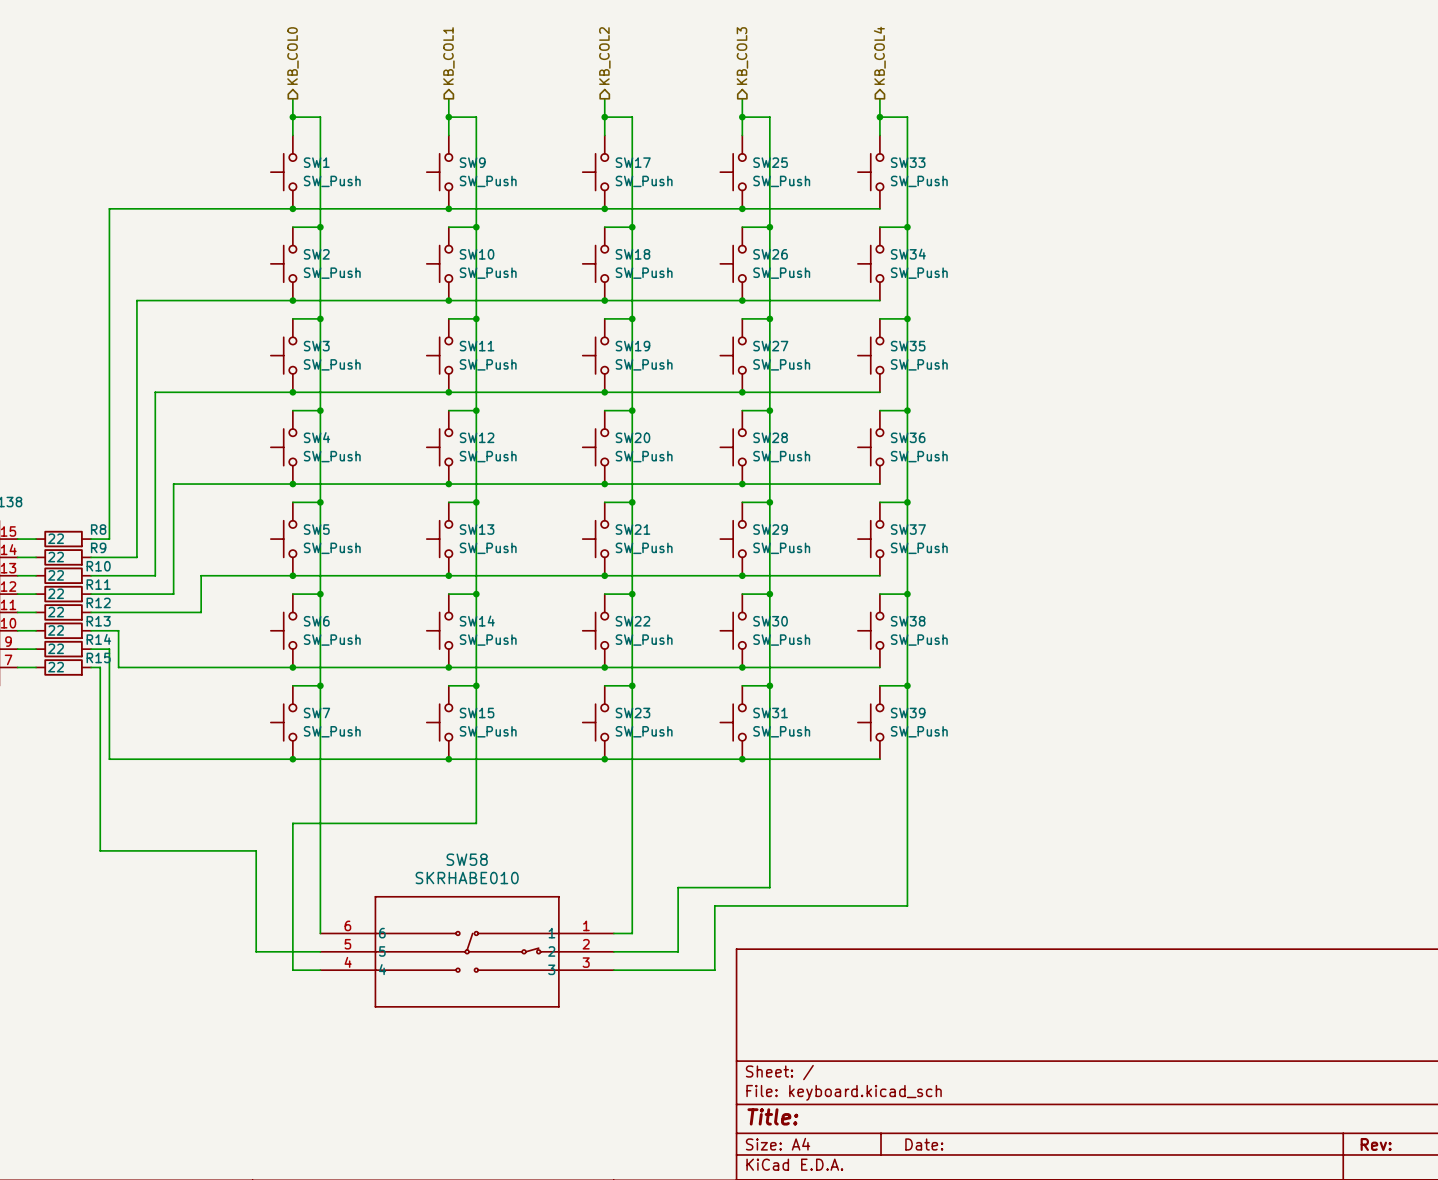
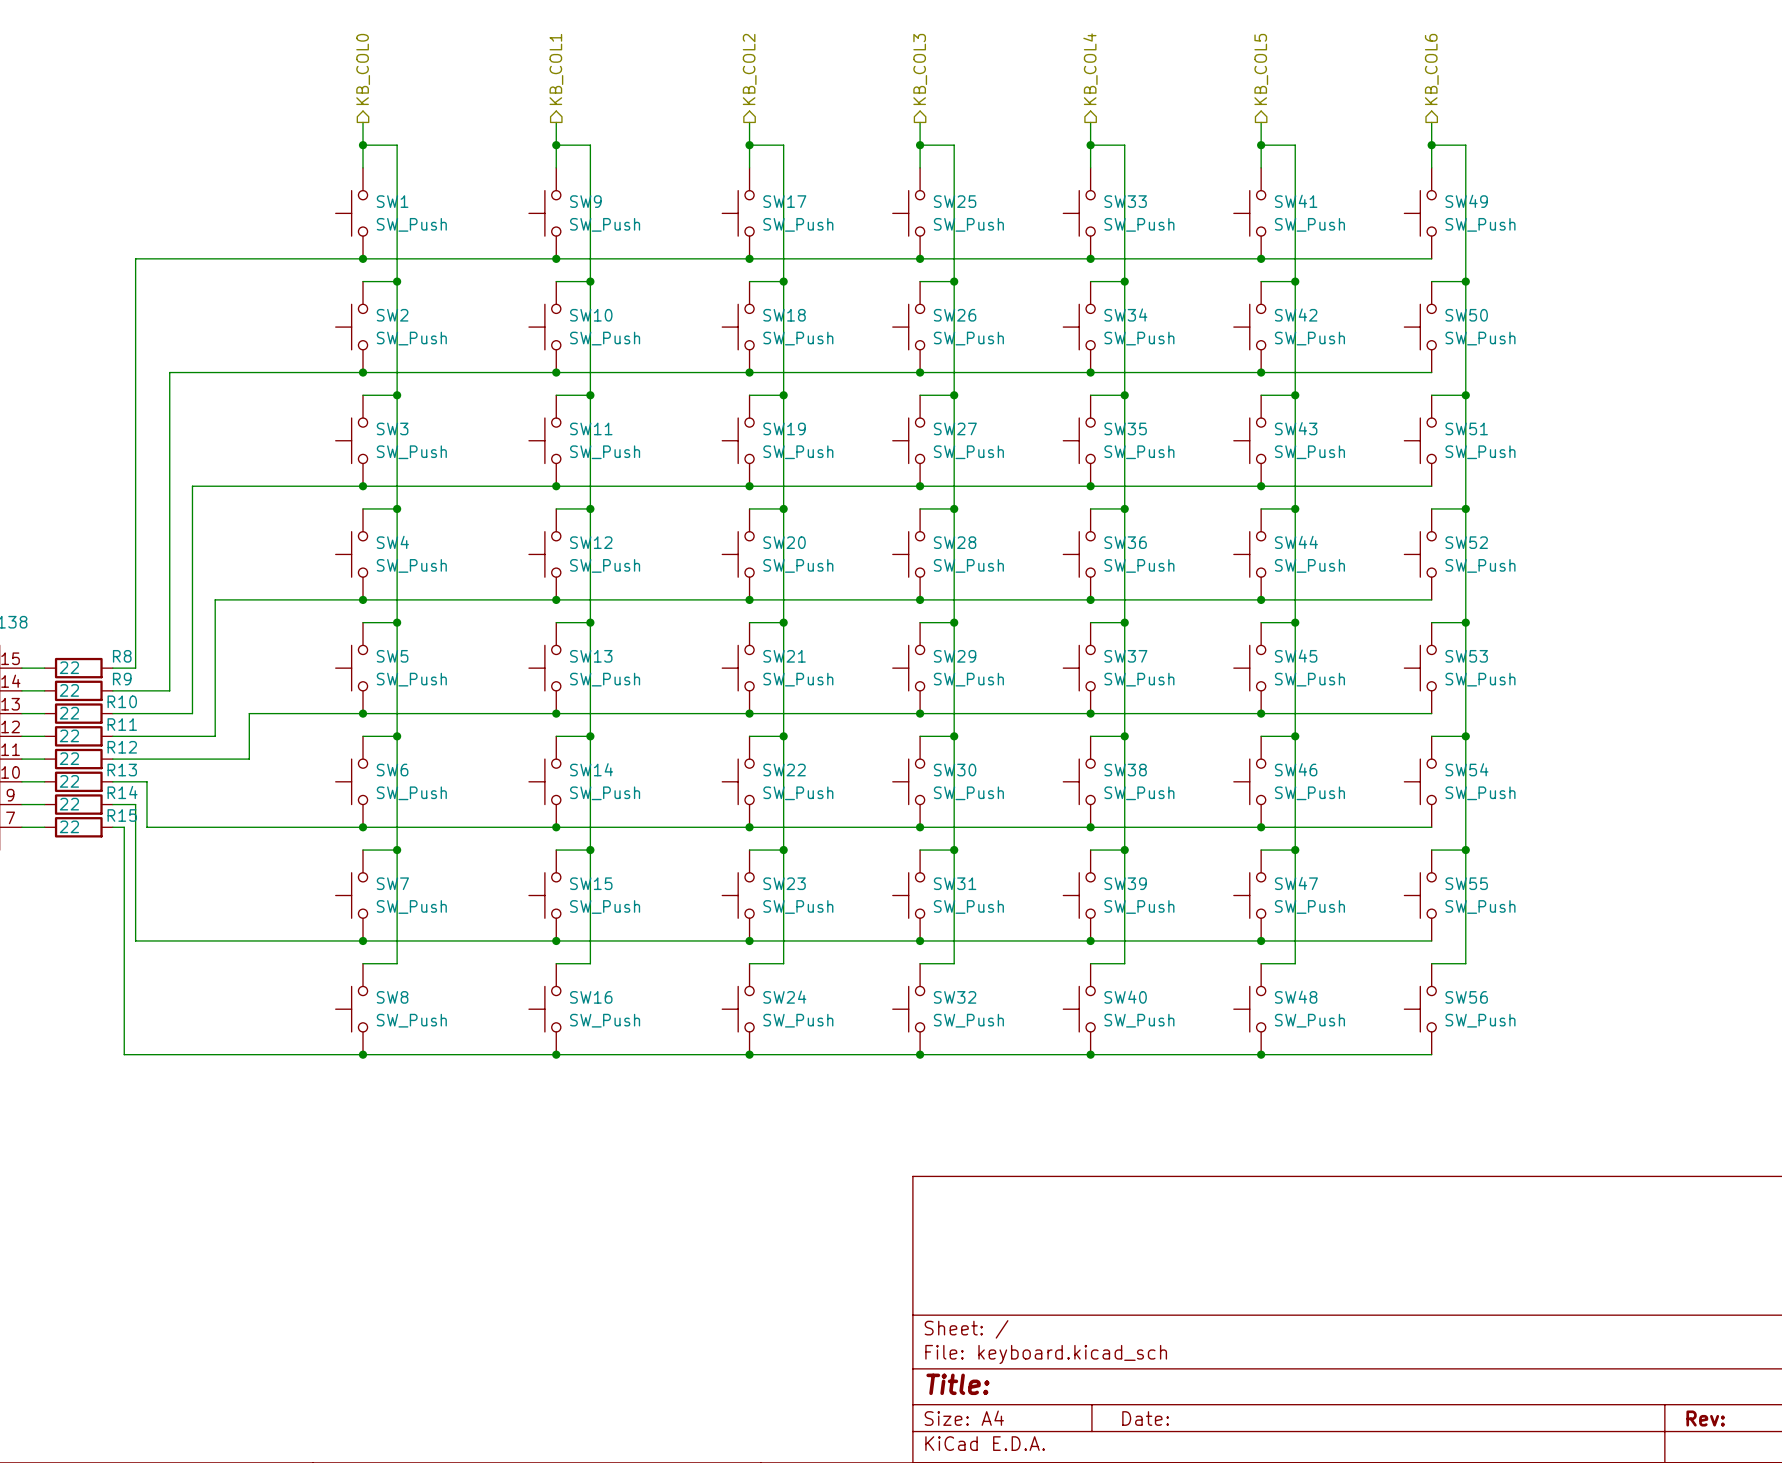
hierarchical label: none -> KB_COL5 (1261, 69)
hierarchical label: none -> KB_COL6 (1431, 69)
wire: none -> (1261, 122) (1261, 167)
wire: none -> (1431, 122) (1431, 167)
wire: none -> (1261, 145) (1295, 145) (1295, 963) (1261, 963)
junction: none -> (1261, 145)
wire: none -> (1431, 145) (1465, 145) (1465, 963) (1431, 963)
junction: none -> (1431, 145)
SW41: none -> SW_Push (1249, 213)
SW49: none -> SW_Push (1420, 213)
wire: none -> (1090, 258) (1431, 258)
junction: none -> (1090, 258)
junction: none -> (1261, 258)
wire: none -> (1261, 281) (1295, 281)
junction: none -> (1295, 281)
wire: none -> (1431, 281) (1465, 281)
junction: none -> (1465, 281)
SW42: none -> SW_Push (1249, 327)
SW50: none -> SW_Push (1420, 327)
wire: none -> (1090, 372) (1431, 372)
junction: none -> (1090, 372)
junction: none -> (1261, 372)
wire: none -> (1261, 395) (1295, 395)
junction: none -> (1295, 395)
wire: none -> (1431, 395) (1465, 395)
junction: none -> (1465, 395)
SW43: none -> SW_Push (1249, 440)
SW51: none -> SW_Push (1420, 440)
wire: none -> (1090, 486) (1431, 486)
junction: none -> (1090, 486)
junction: none -> (1261, 486)
wire: none -> (1261, 508) (1295, 508)
junction: none -> (1295, 508)
wire: none -> (1431, 508) (1465, 508)
junction: none -> (1465, 508)
SW44: none -> SW_Push (1249, 554)
SW52: none -> SW_Push (1420, 554)
wire: none -> (1090, 599) (1431, 599)
junction: none -> (1090, 599)
junction: none -> (1261, 599)
wire: none -> (1261, 622) (1295, 622)
junction: none -> (1295, 622)
wire: none -> (1431, 622) (1465, 622)
junction: none -> (1465, 622)
SW45: none -> SW_Push (1249, 668)
SW53: none -> SW_Push (1420, 668)
wire: none -> (1090, 713) (1431, 713)
junction: none -> (1090, 713)
junction: none -> (1261, 713)
wire: none -> (1261, 736) (1295, 736)
junction: none -> (1295, 736)
wire: none -> (1431, 736) (1465, 736)
junction: none -> (1465, 736)
SW46: none -> SW_Push (1249, 781)
SW54: none -> SW_Push (1420, 781)
wire: none -> (1090, 827) (1431, 827)
junction: none -> (1090, 827)
junction: none -> (1261, 827)
wire: none -> (1261, 850) (1295, 850)
junction: none -> (1295, 850)
wire: none -> (1431, 850) (1465, 850)
junction: none -> (1465, 850)
SW47: none -> SW_Push (1249, 895)
SW55: none -> SW_Push (1420, 895)
wire: none -> (1090, 940) (1431, 940)
junction: none -> (1090, 940)
junction: none -> (1261, 940)
wire: (320, 777) (320, 933) -> (397, 963) (363, 963)
wire: (476, 777) (476, 823) (292, 823) (292, 970) (320, 970) -> (590, 963) (556, 963)
wire: (632, 777) (632, 933) (613, 933) -> (783, 963) (749, 963)
wire: (769, 777) (769, 887) (678, 887) (678, 951) (613, 951) -> (954, 963) (920, 963)
wire: (907, 777) (907, 905) (714, 905) (714, 970) (613, 970) -> (1124, 963) (1090, 963)
SW8: none -> SW_Push (351, 1009)
SW16: none -> SW_Push (544, 1009)
SW24: none -> SW_Push (738, 1009)
SW32: none -> SW_Push (908, 1009)
SW40: none -> SW_Push (1079, 1009)
SW48: none -> SW_Push (1249, 1009)
SW56: none -> SW_Push (1420, 1009)
wire: (256, 850) (256, 951) (320, 951) -> (317, 1054) (1431, 1054)
junction: none -> (363, 1054)
junction: none -> (556, 1054)
junction: none -> (749, 1054)
junction: none -> (920, 1054)
junction: none -> (1090, 1054)
junction: none -> (1261, 1054)
SW58: SKRHABE010 (467, 951) -> none

